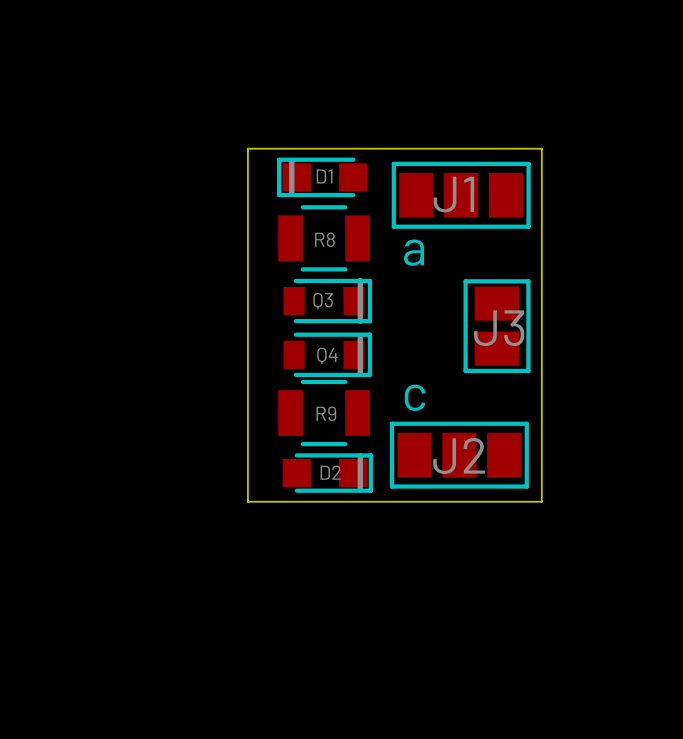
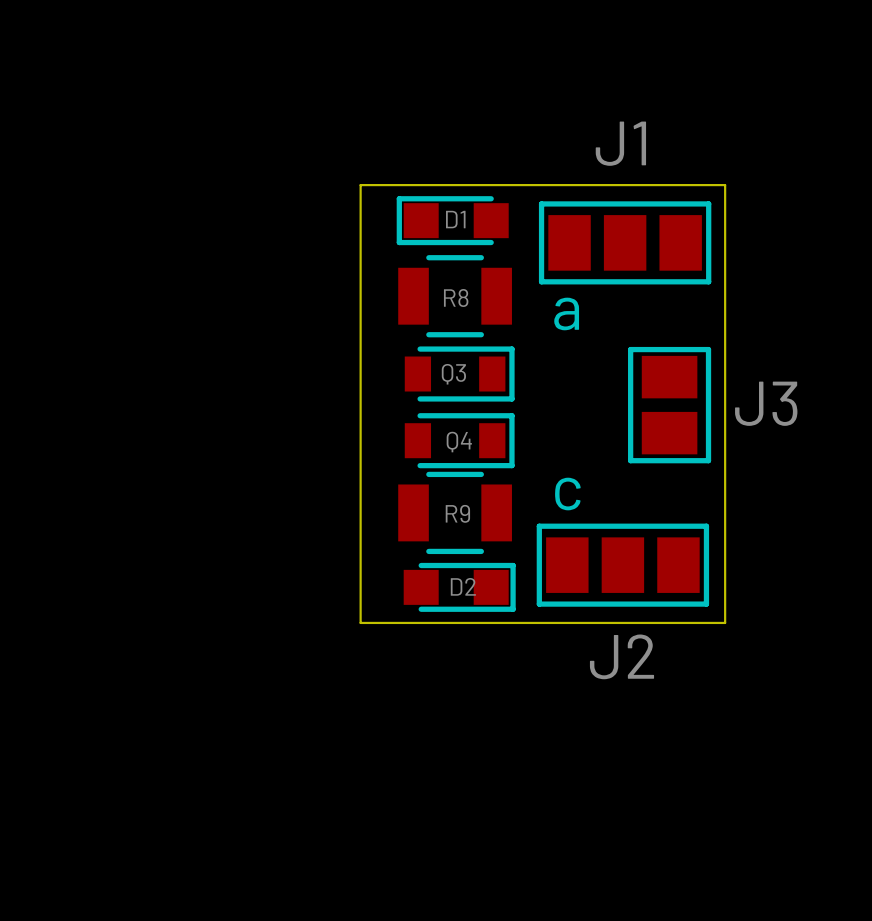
line: (291, 161) (291, 194) -> none
J1 name position: J1 (453, 194) -> J1 (620, 143)
line: (360, 280) (360, 321) -> none
J3 name position: J3 (499, 328) -> J3 (766, 403)
line: (360, 335) (360, 372) -> none
line: (360, 455) (360, 490) -> none
J2 name position: J2 (459, 455) -> J2 (621, 656)

